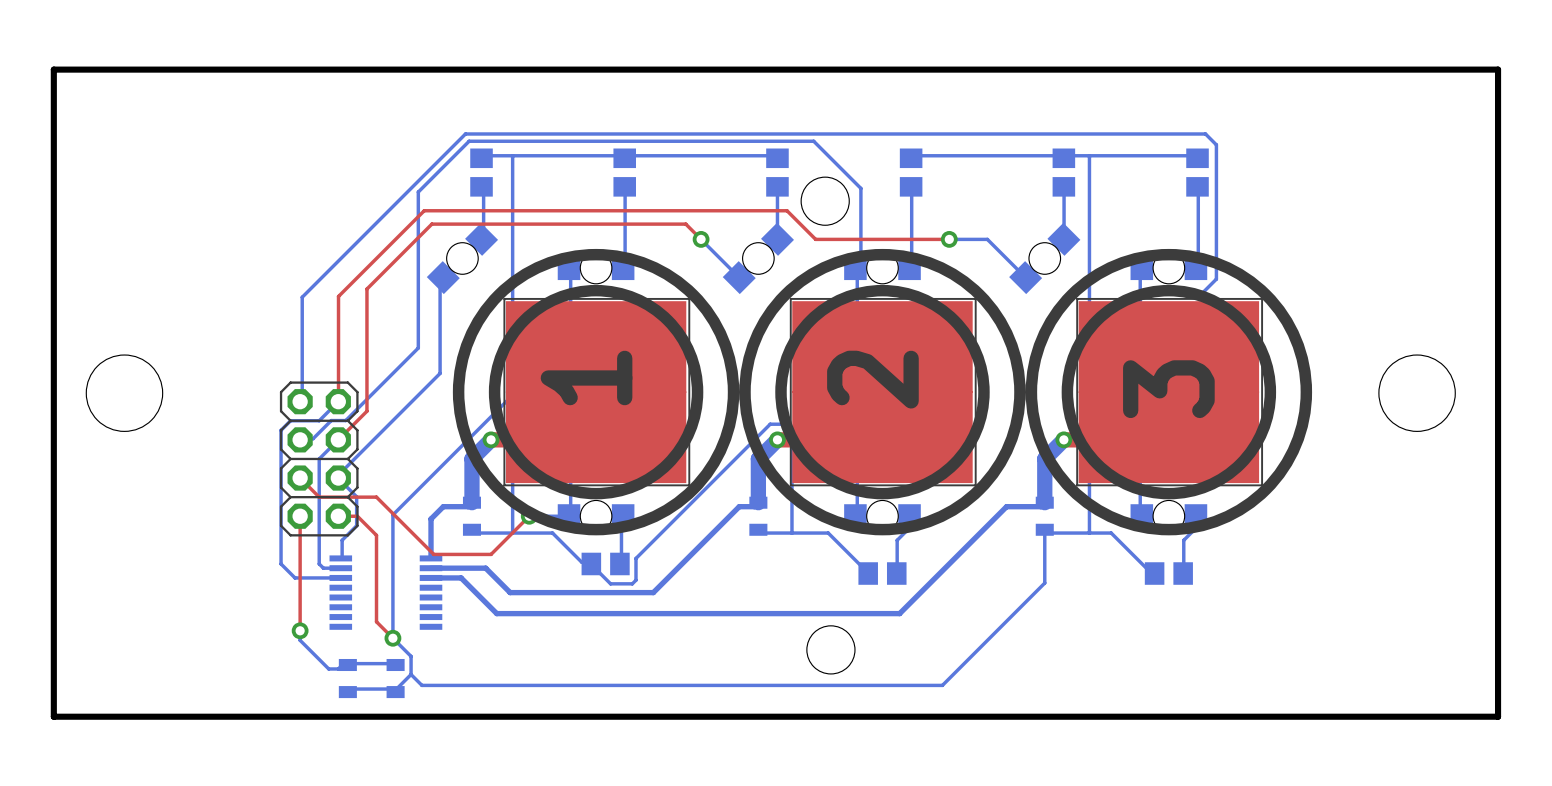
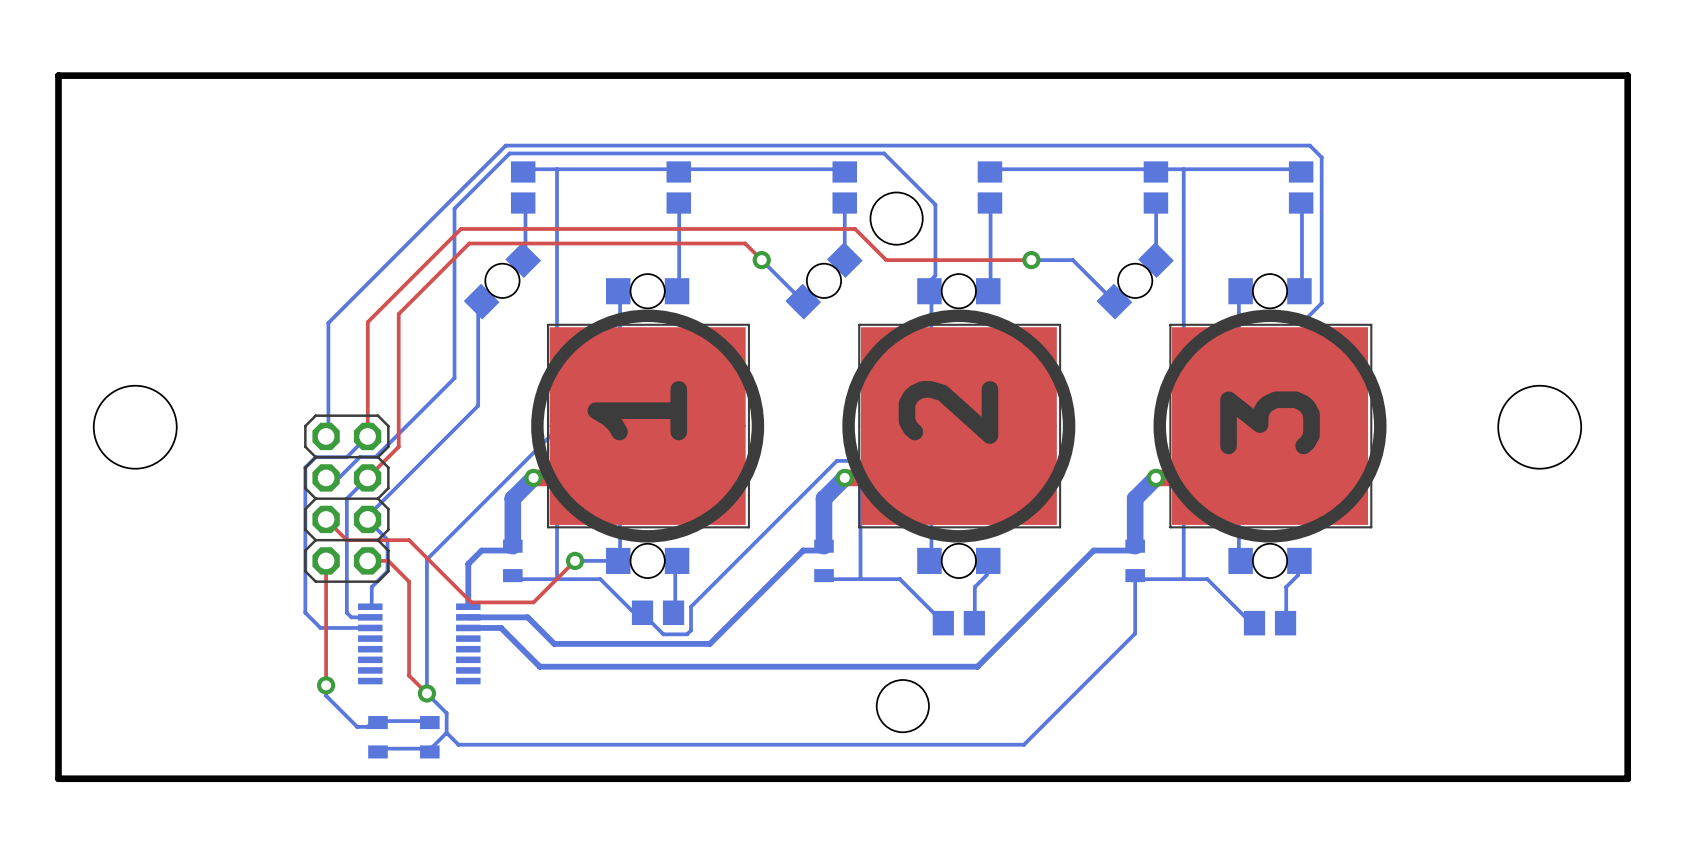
drawing: [452, 248, 1313, 536] -> none

